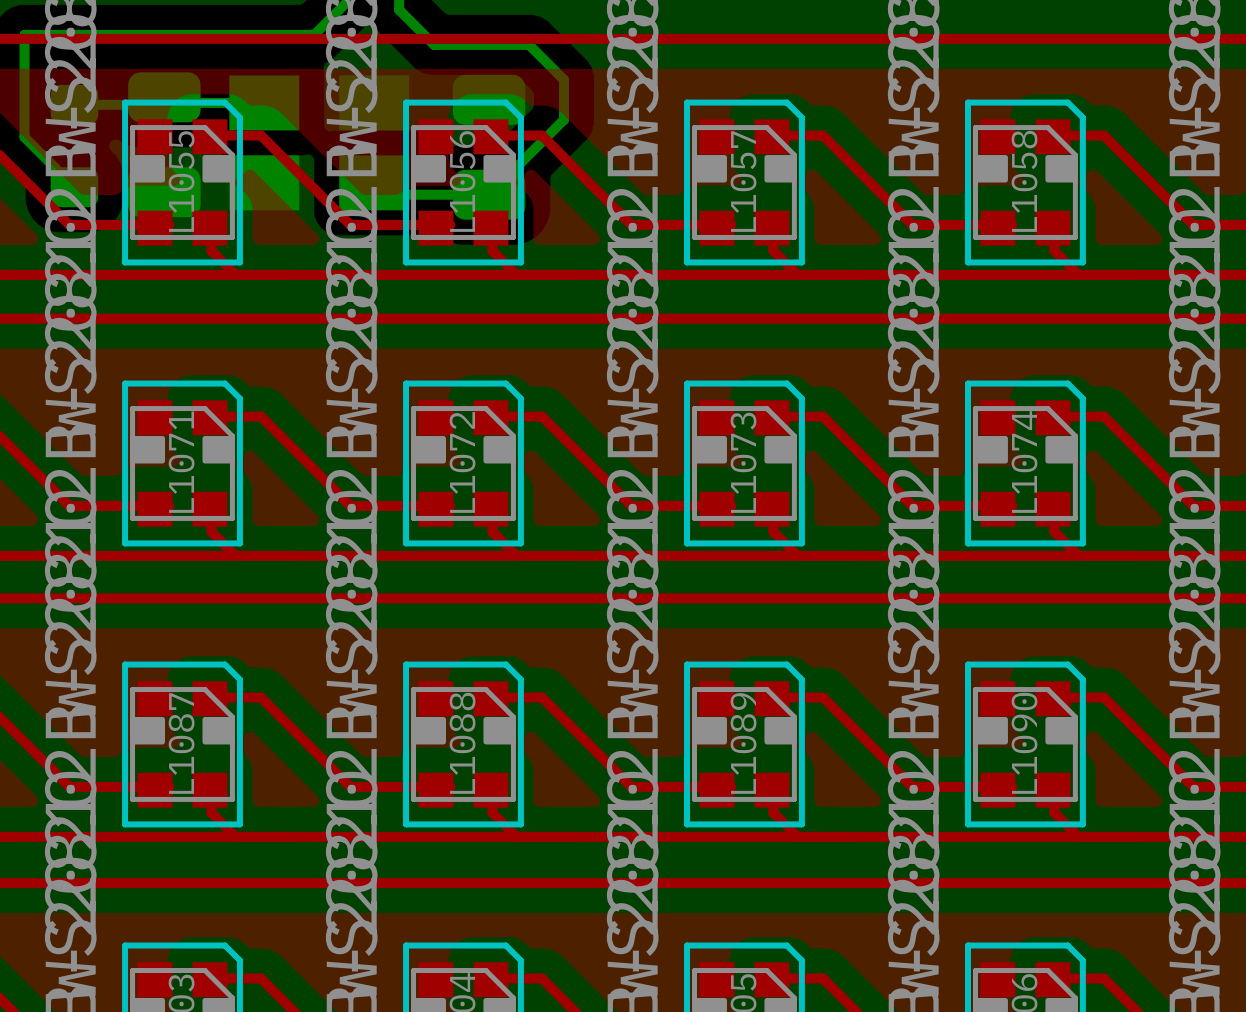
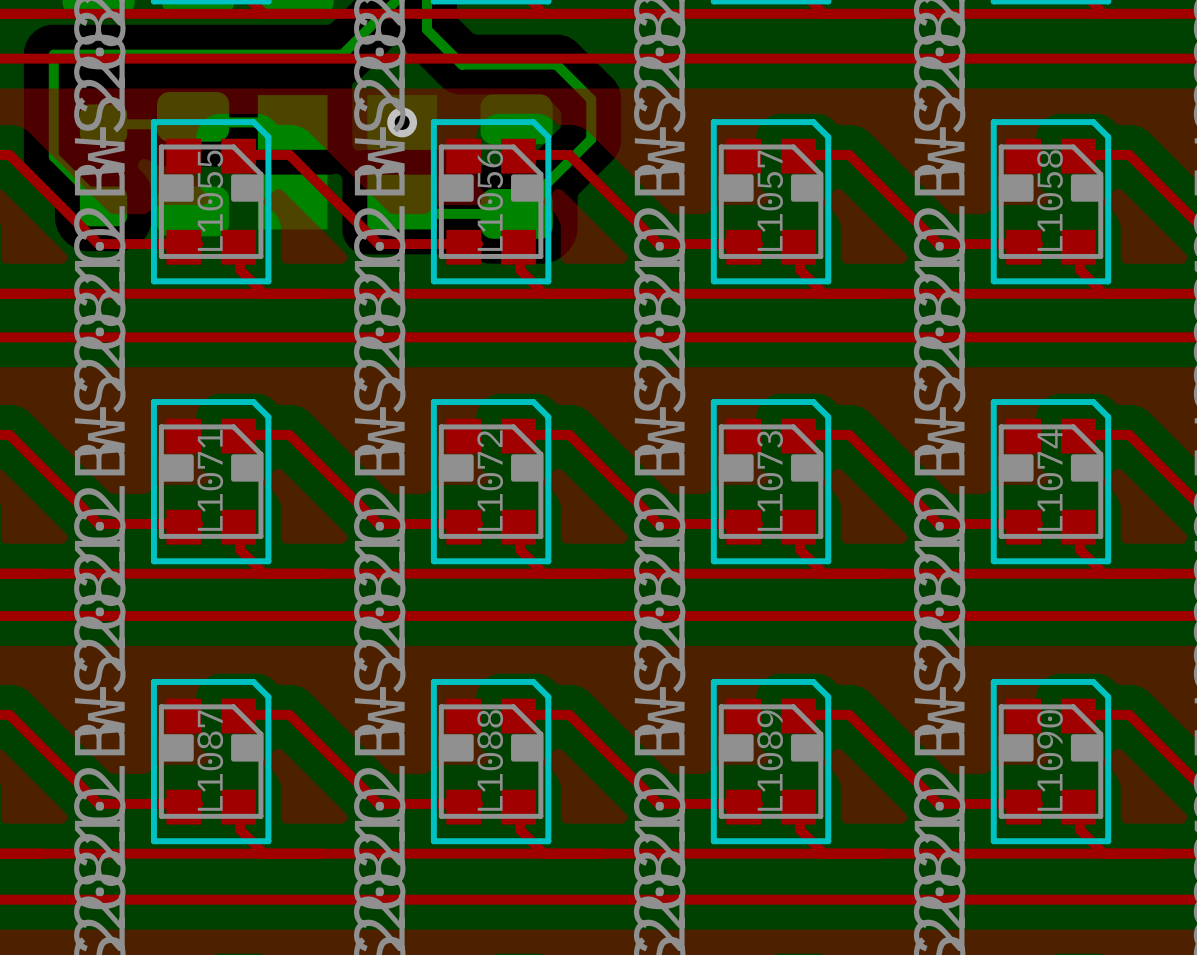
via: none -> (402, 122)

